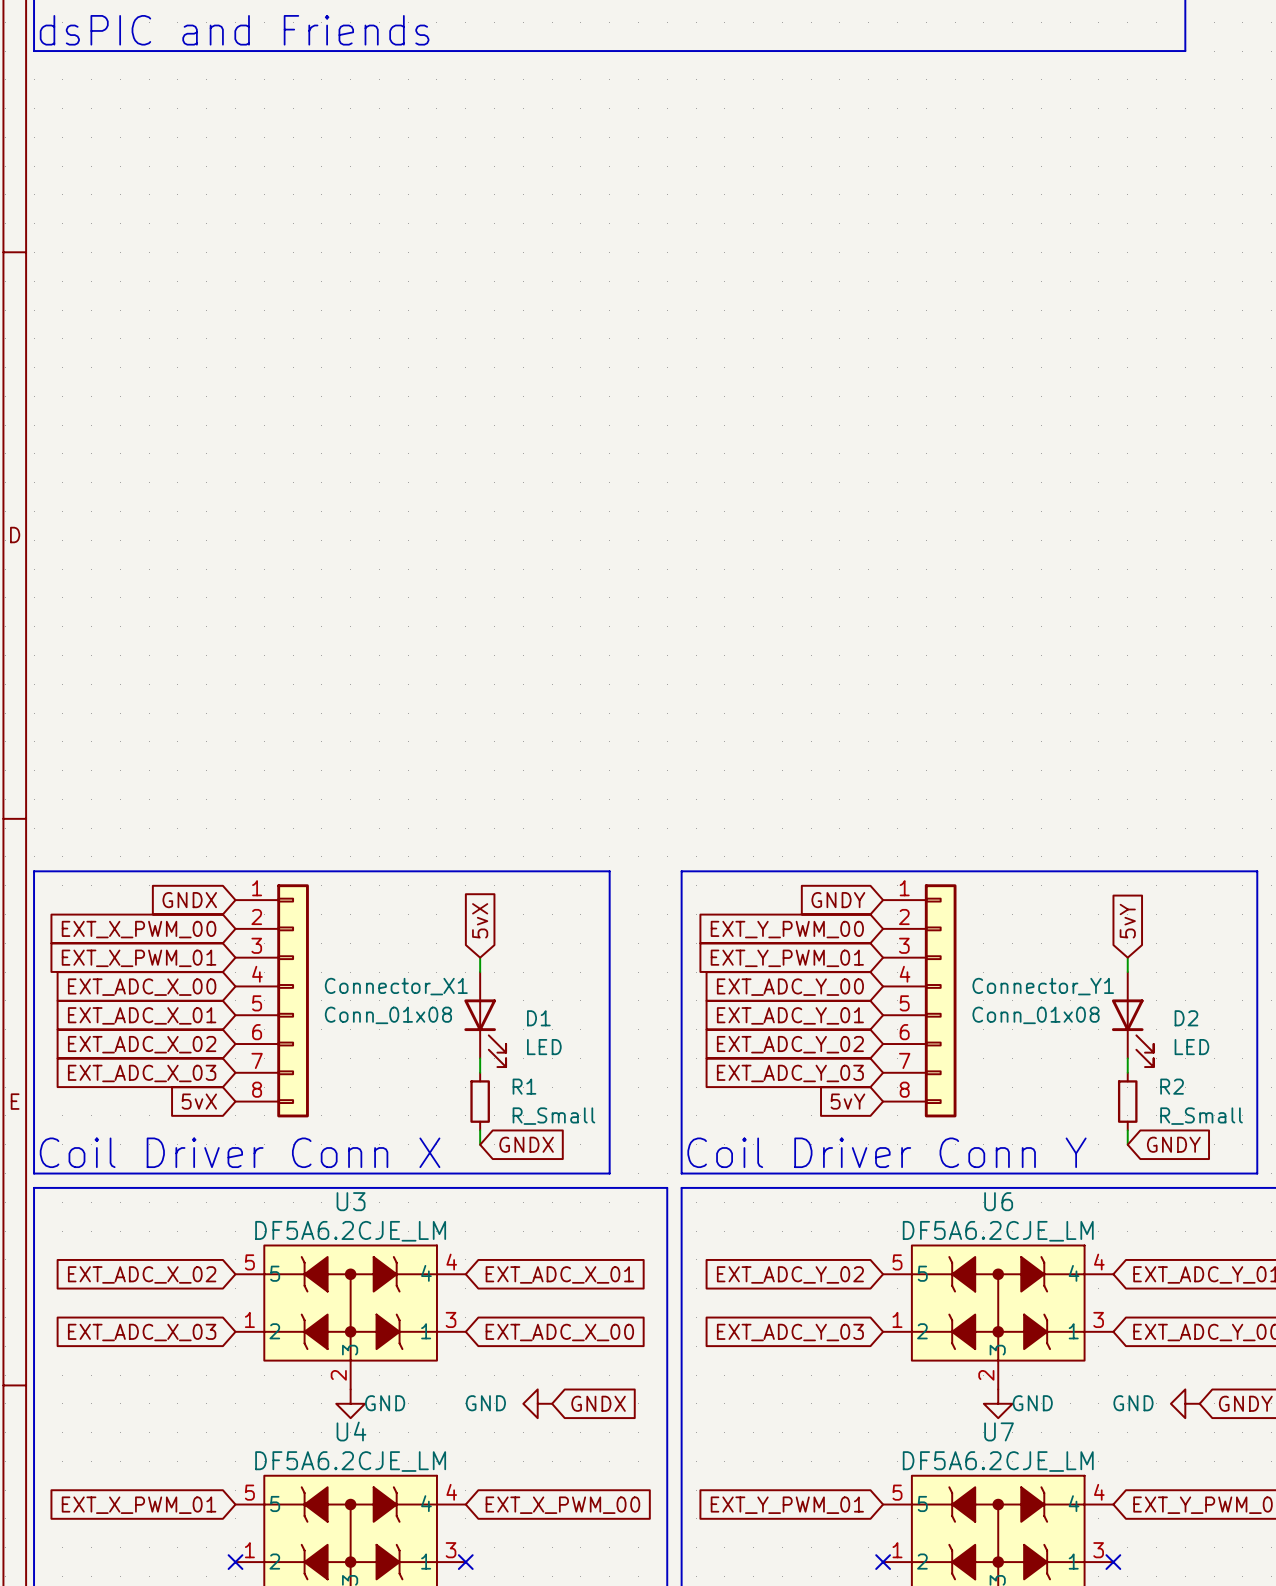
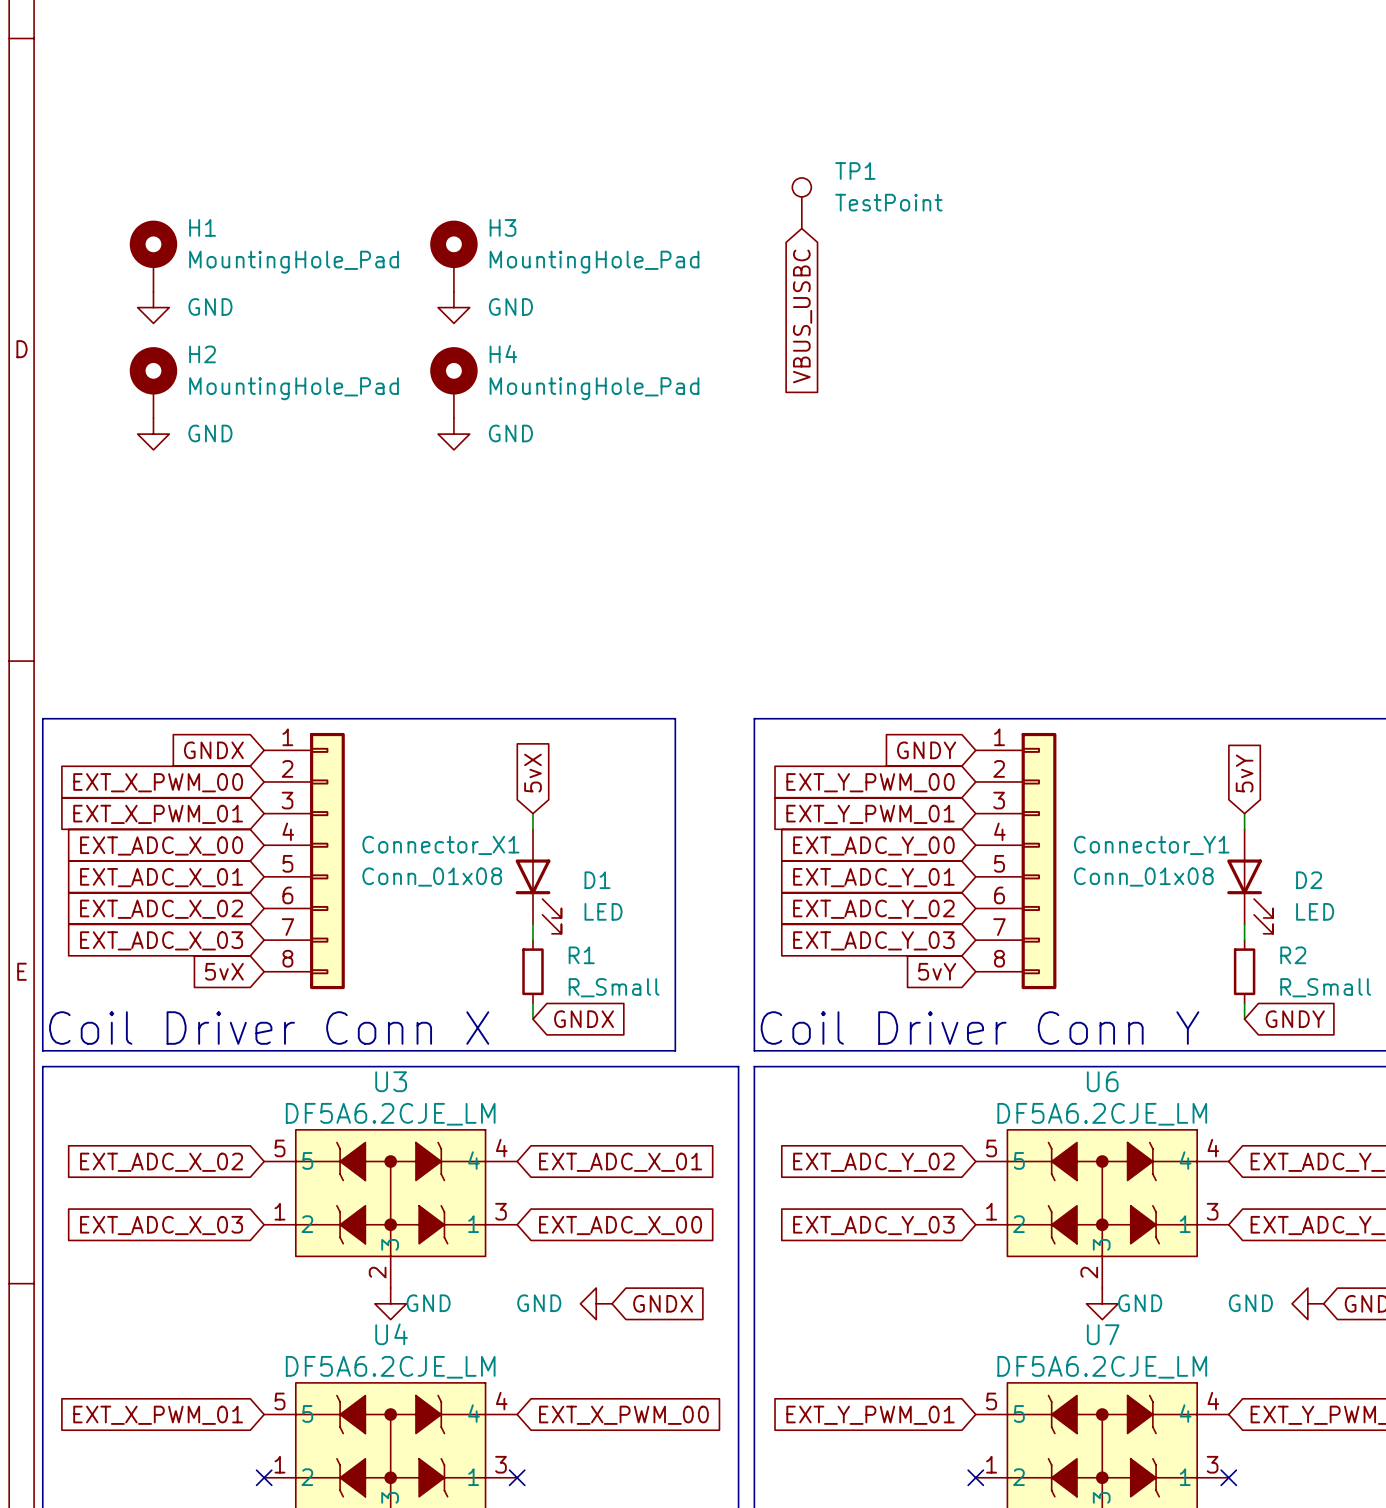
TP1: none -> TestPoint (801, 203)
H1: none -> MountingHole_Pad (153, 256)
H3: none -> MountingHole_Pad (453, 256)
power symbol: none -> GND (153, 307)
power symbol: none -> GND (453, 307)
global label: none -> VBUS_USBC (802, 316)
H2: none -> MountingHole_Pad (153, 382)
H4: none -> MountingHole_Pad (453, 382)
power symbol: none -> GND (153, 434)
power symbol: none -> GND (453, 434)

